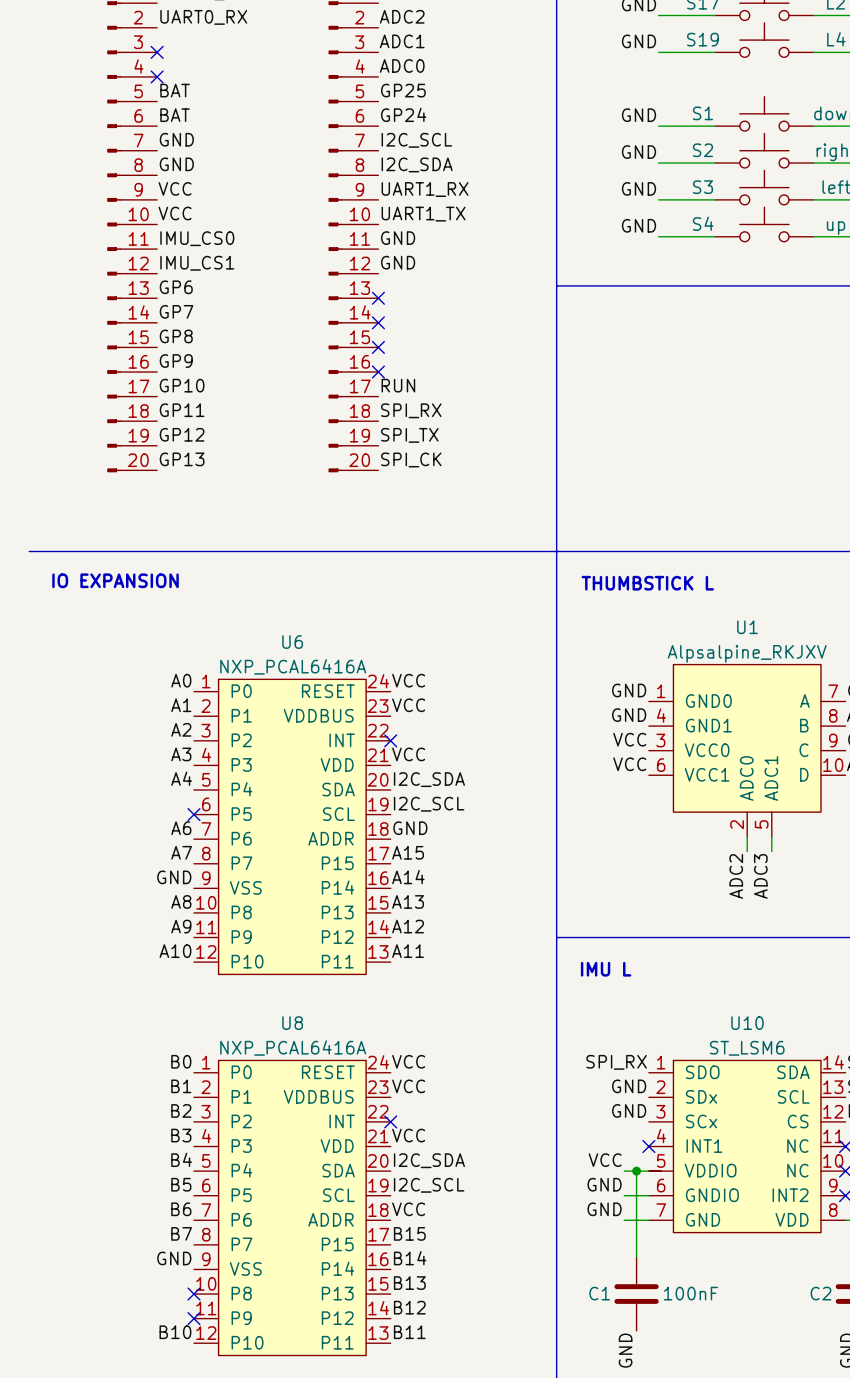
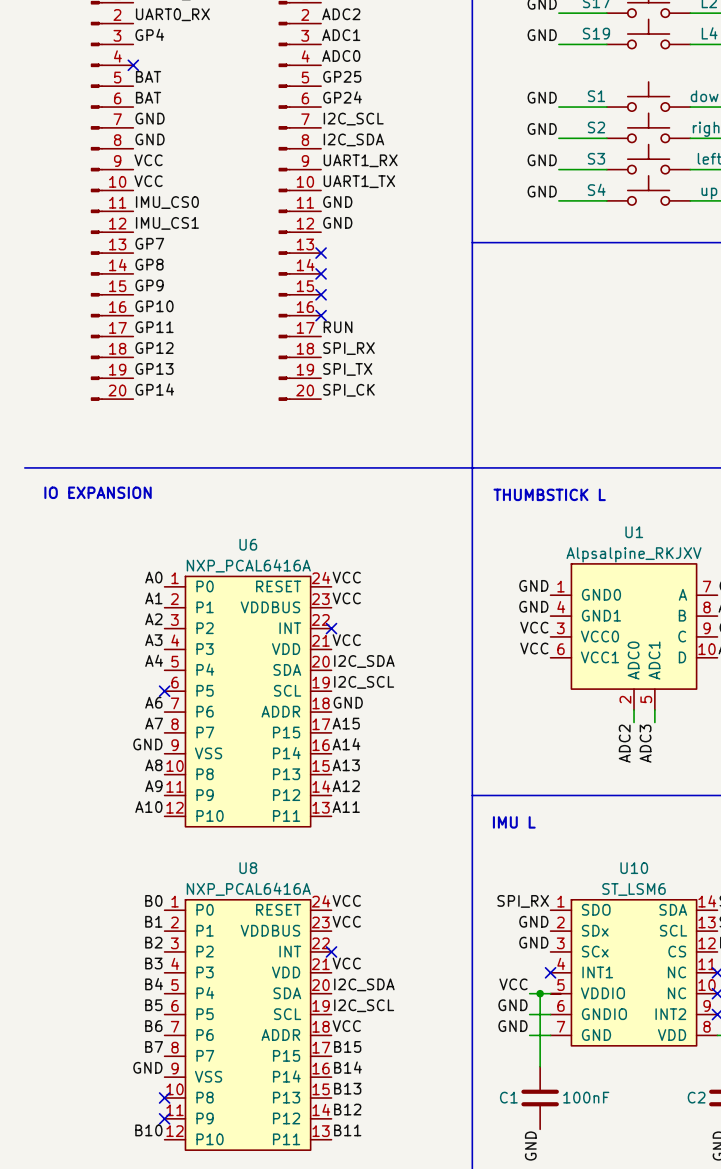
label: none -> GP4 (149, 34)
no-connect mark: (157, 52) -> none
label: GP6 (176, 287) -> GP7 (149, 243)
label: GP7 (176, 311) -> GP8 (149, 264)
label: GP8 (176, 336) -> GP9 (149, 285)
label: GP9 (176, 361) -> GP10 (154, 306)
label: GP10 (182, 385) -> GP11 (154, 327)
label: GP11 (182, 410) -> GP12 (154, 348)
label: GP12 (182, 434) -> GP13 (154, 368)
label: GP13 (182, 459) -> GP14 (154, 389)

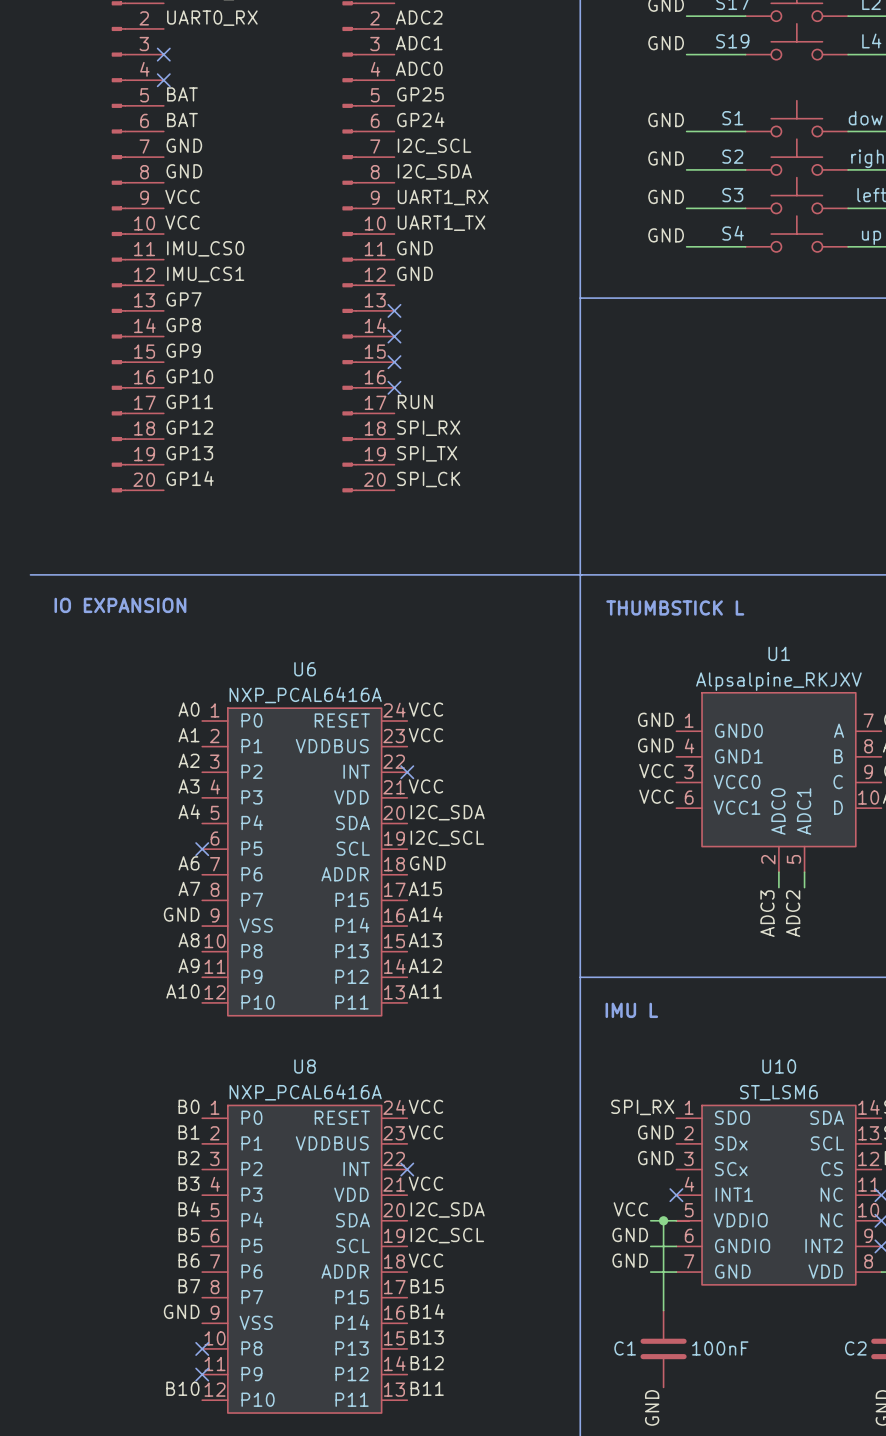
label: GP4 (149, 34) -> none
no-connect mark: none -> (163, 54)
label: ADC2 (624, 743) -> ADC3 (767, 913)
label: ADC3 (645, 743) -> ADC2 (793, 913)

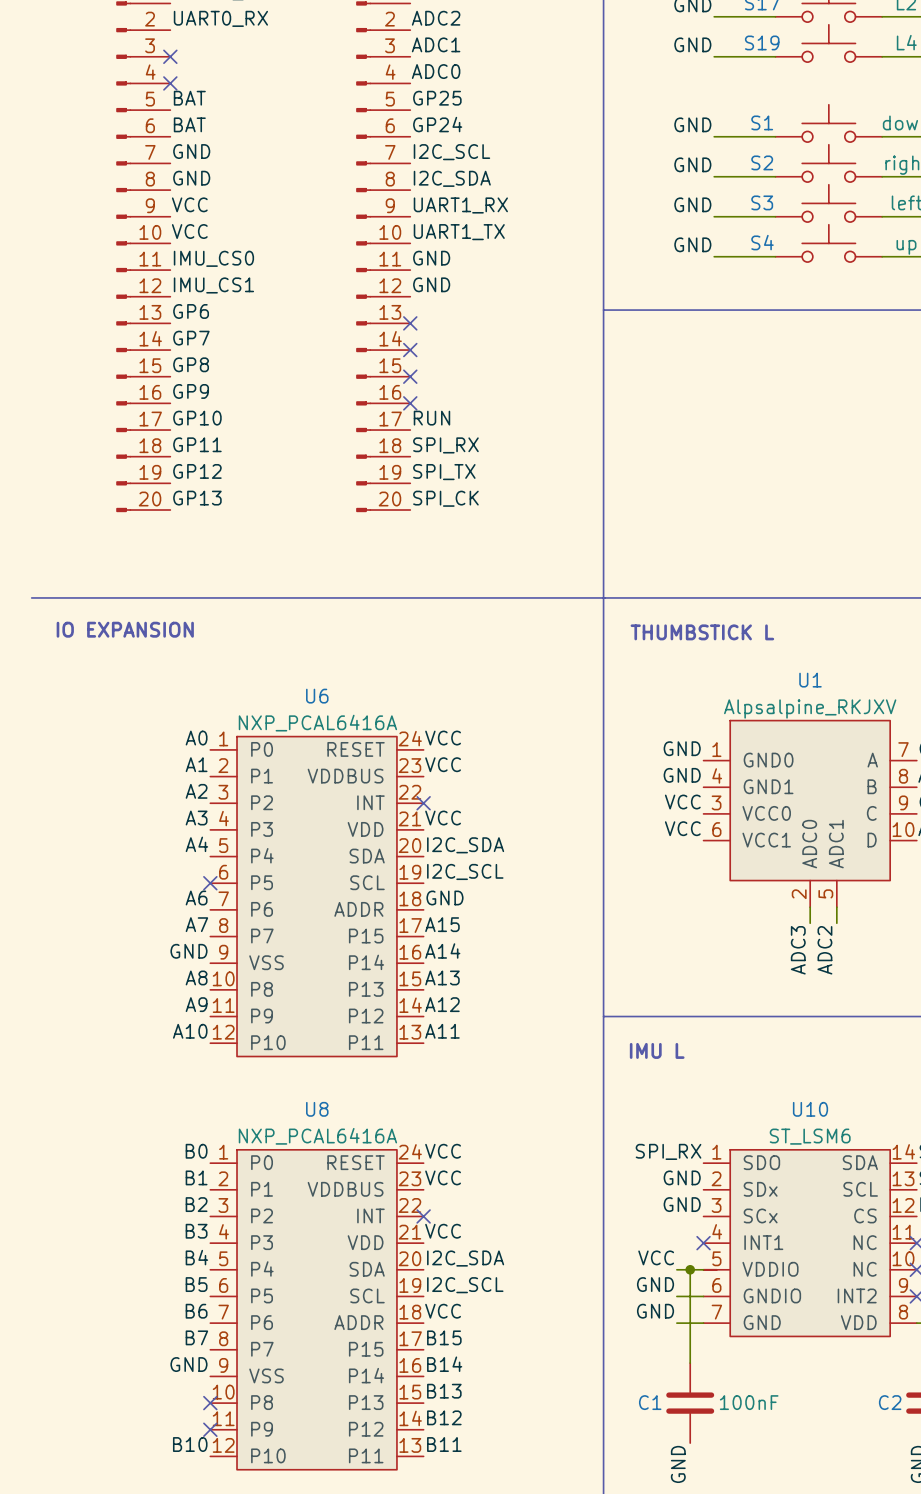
label: GP7 (184, 299) -> GP6 (191, 311)
label: GP8 (183, 325) -> GP7 (191, 338)
label: GP9 (183, 350) -> GP8 (191, 364)
label: GP10 (189, 376) -> GP9 (191, 391)
label: GP11 (189, 401) -> GP10 (197, 418)
label: GP12 (189, 427) -> GP11 (197, 444)
label: GP13 (189, 453) -> GP12 (197, 471)
label: GP14 (190, 478) -> GP13 (197, 498)

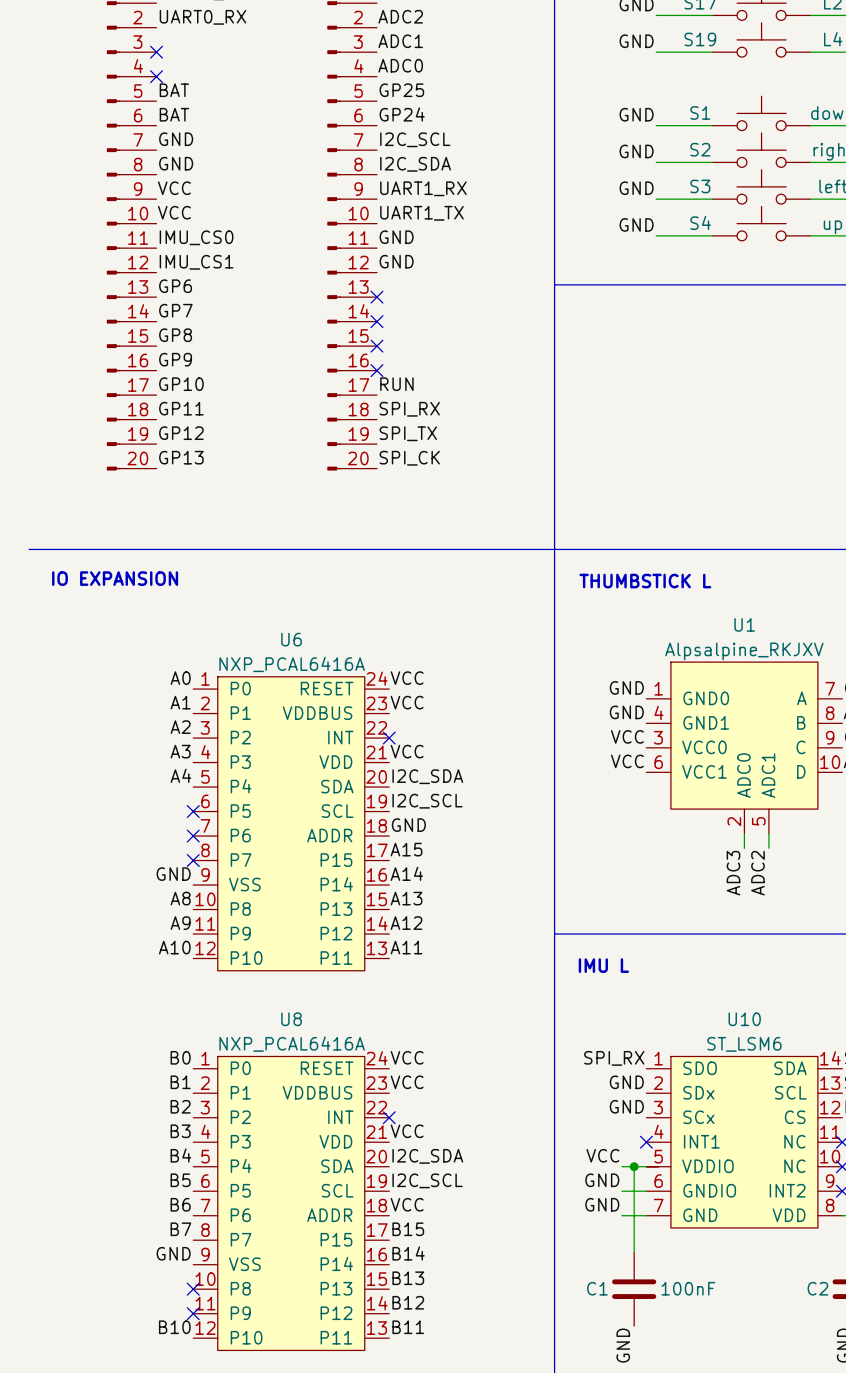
label: A6 (196, 897) -> none
no-connect mark: none -> (193, 836)
label: A7 (196, 924) -> none
no-connect mark: none -> (193, 860)

